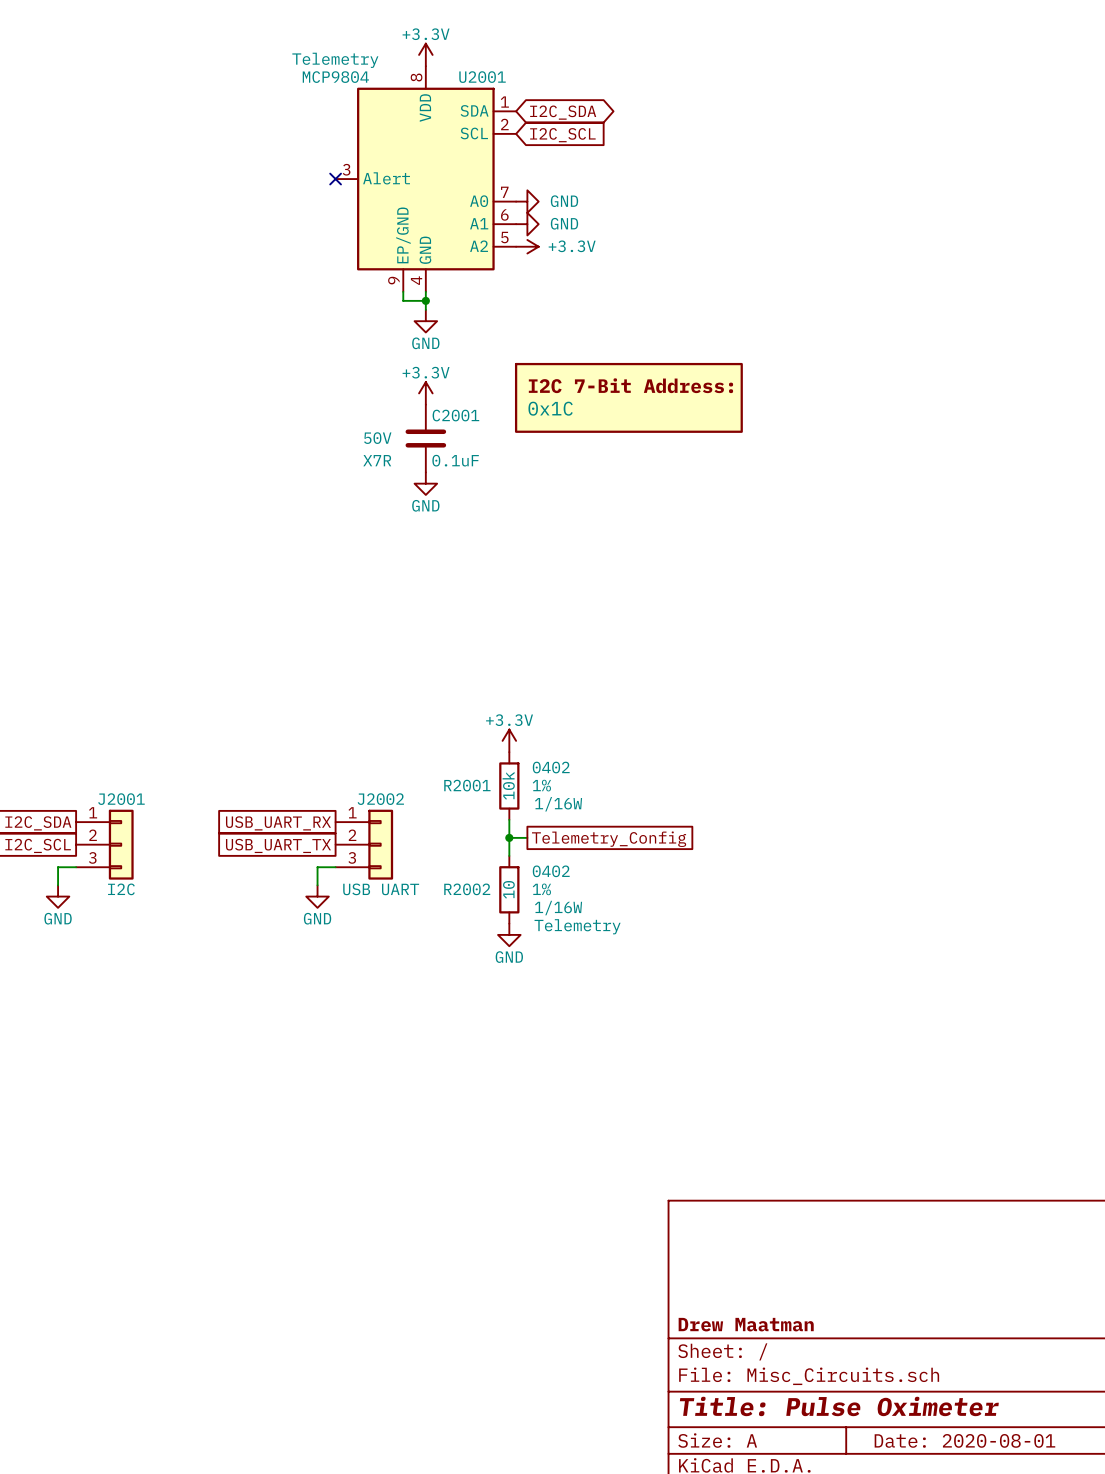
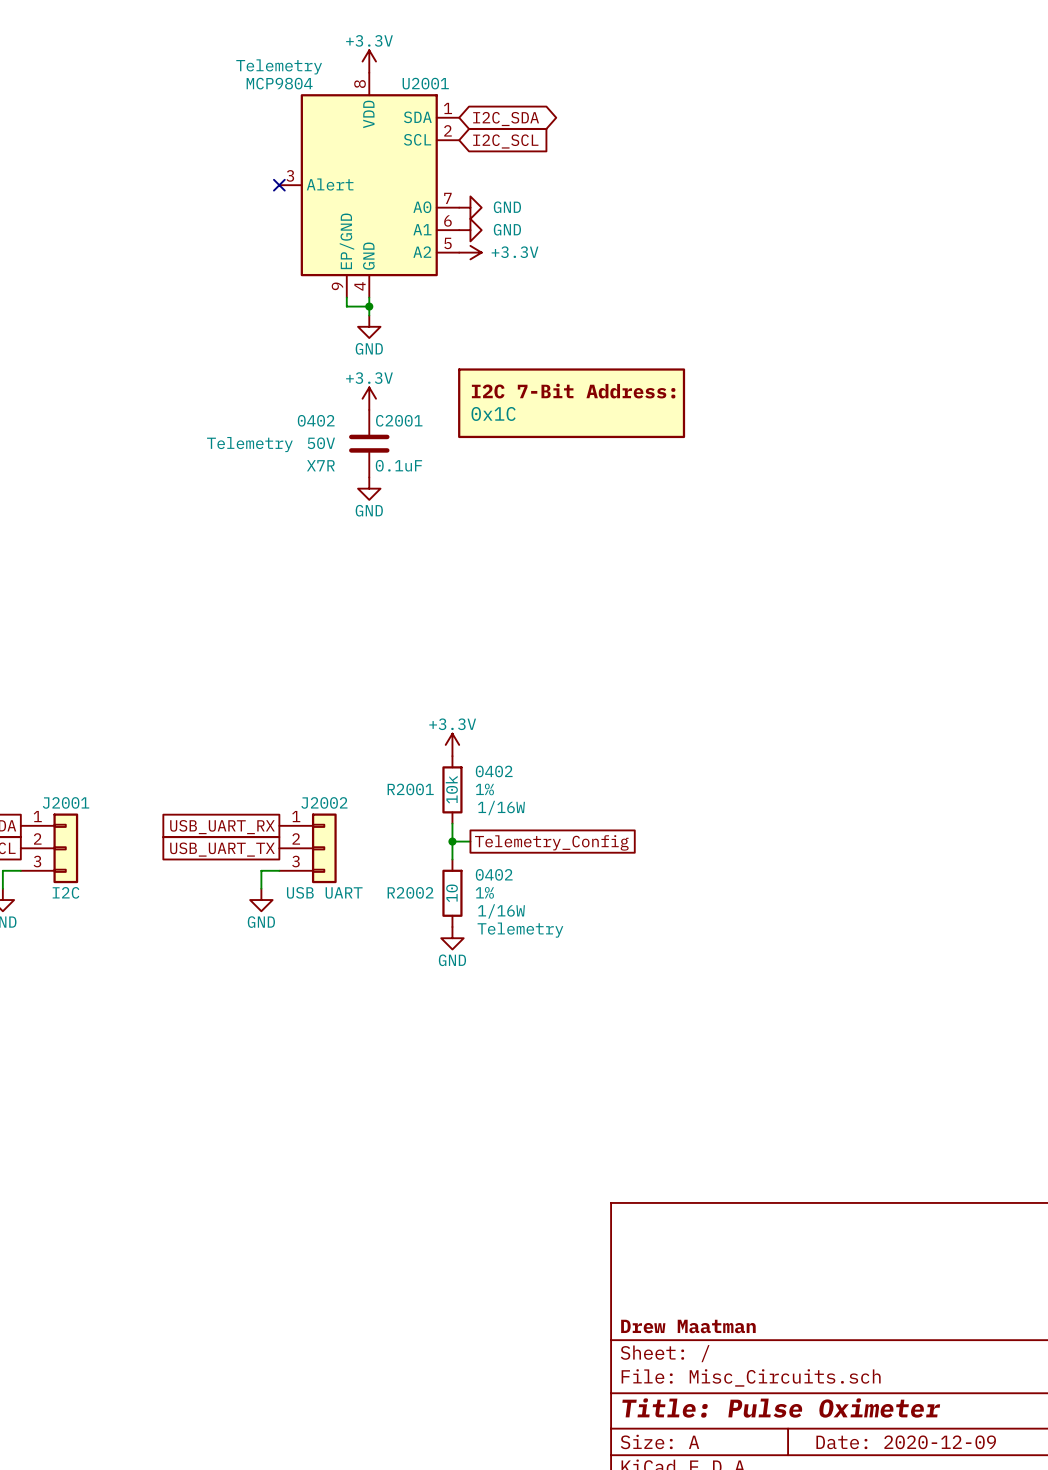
C2001 text: none -> 0402 (316, 420)
C2001 text: none -> Telemetry (249, 444)
title block: Date: 2020-08-01 (964, 1440) -> Date: 2020-12-09 (906, 1442)

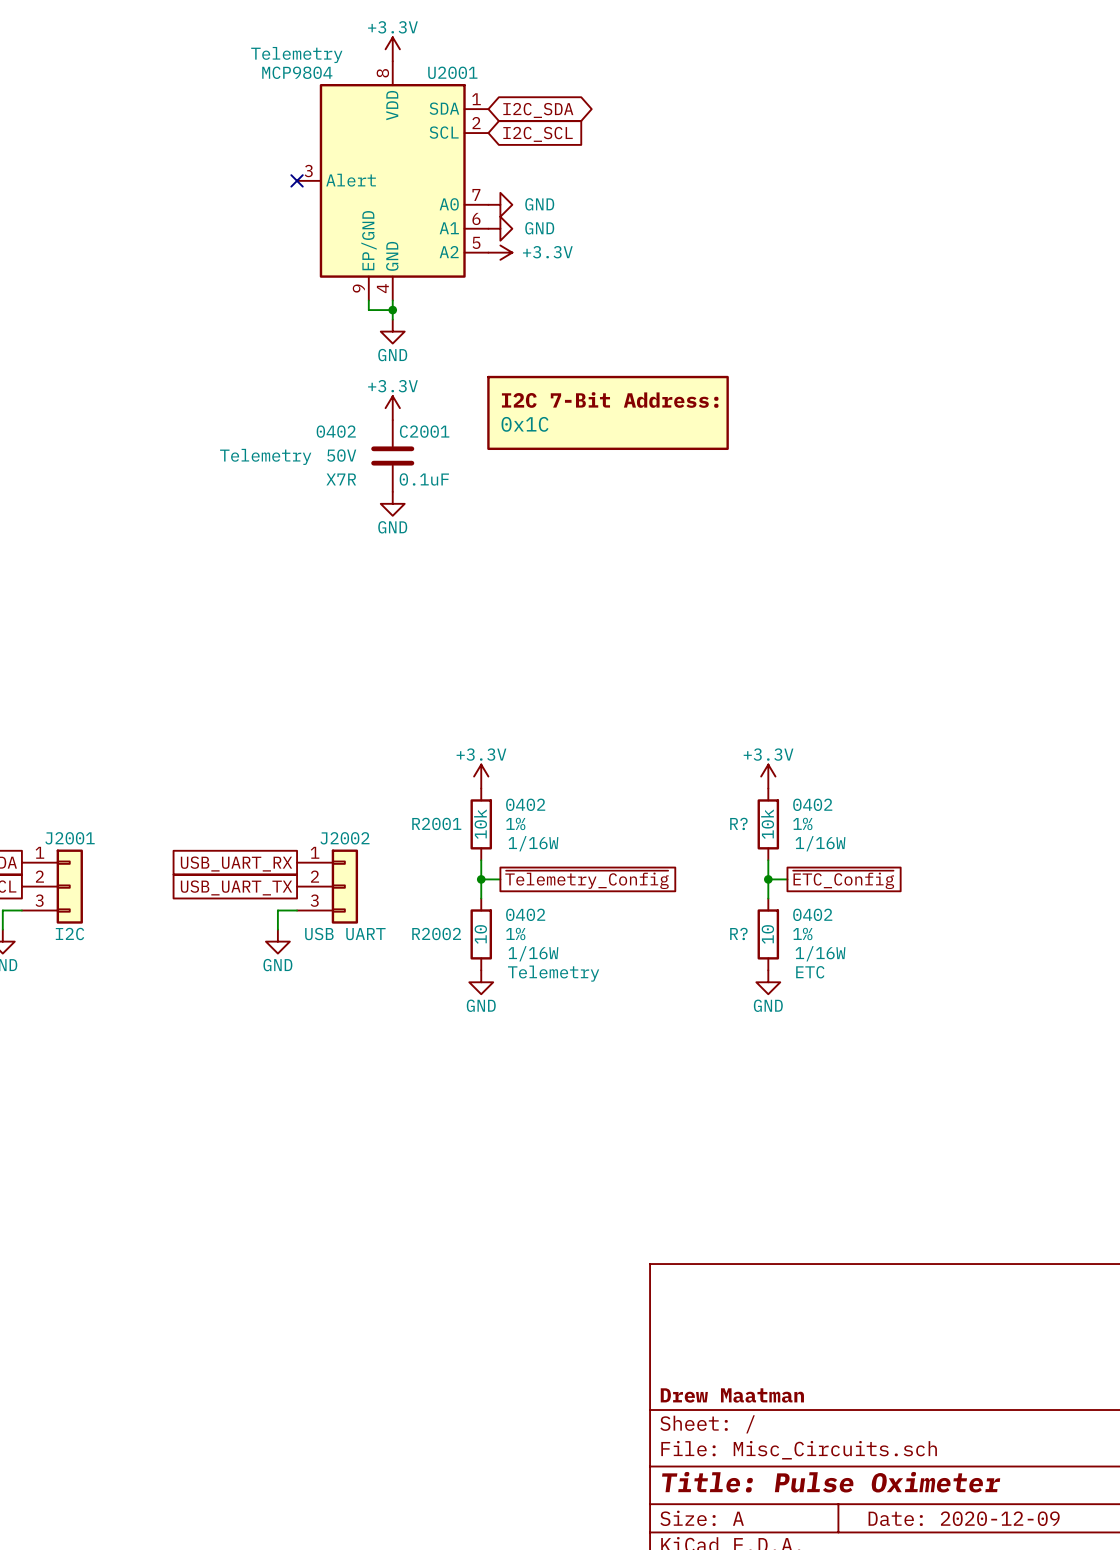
power symbol: none -> +3.3V (768, 776)
R?: none -> 10k (768, 824)
wire: none -> (768, 860) (768, 898)
wire: none -> (768, 879) (787, 879)
junction: none -> (768, 879)
global label: none -> ~{ETC_Config} (843, 879)
global label: Telemetry_Config (551, 842) -> ~{Telemetry_Config} (587, 879)
R?: none -> 10 (768, 934)
power symbol: none -> GND (768, 982)

